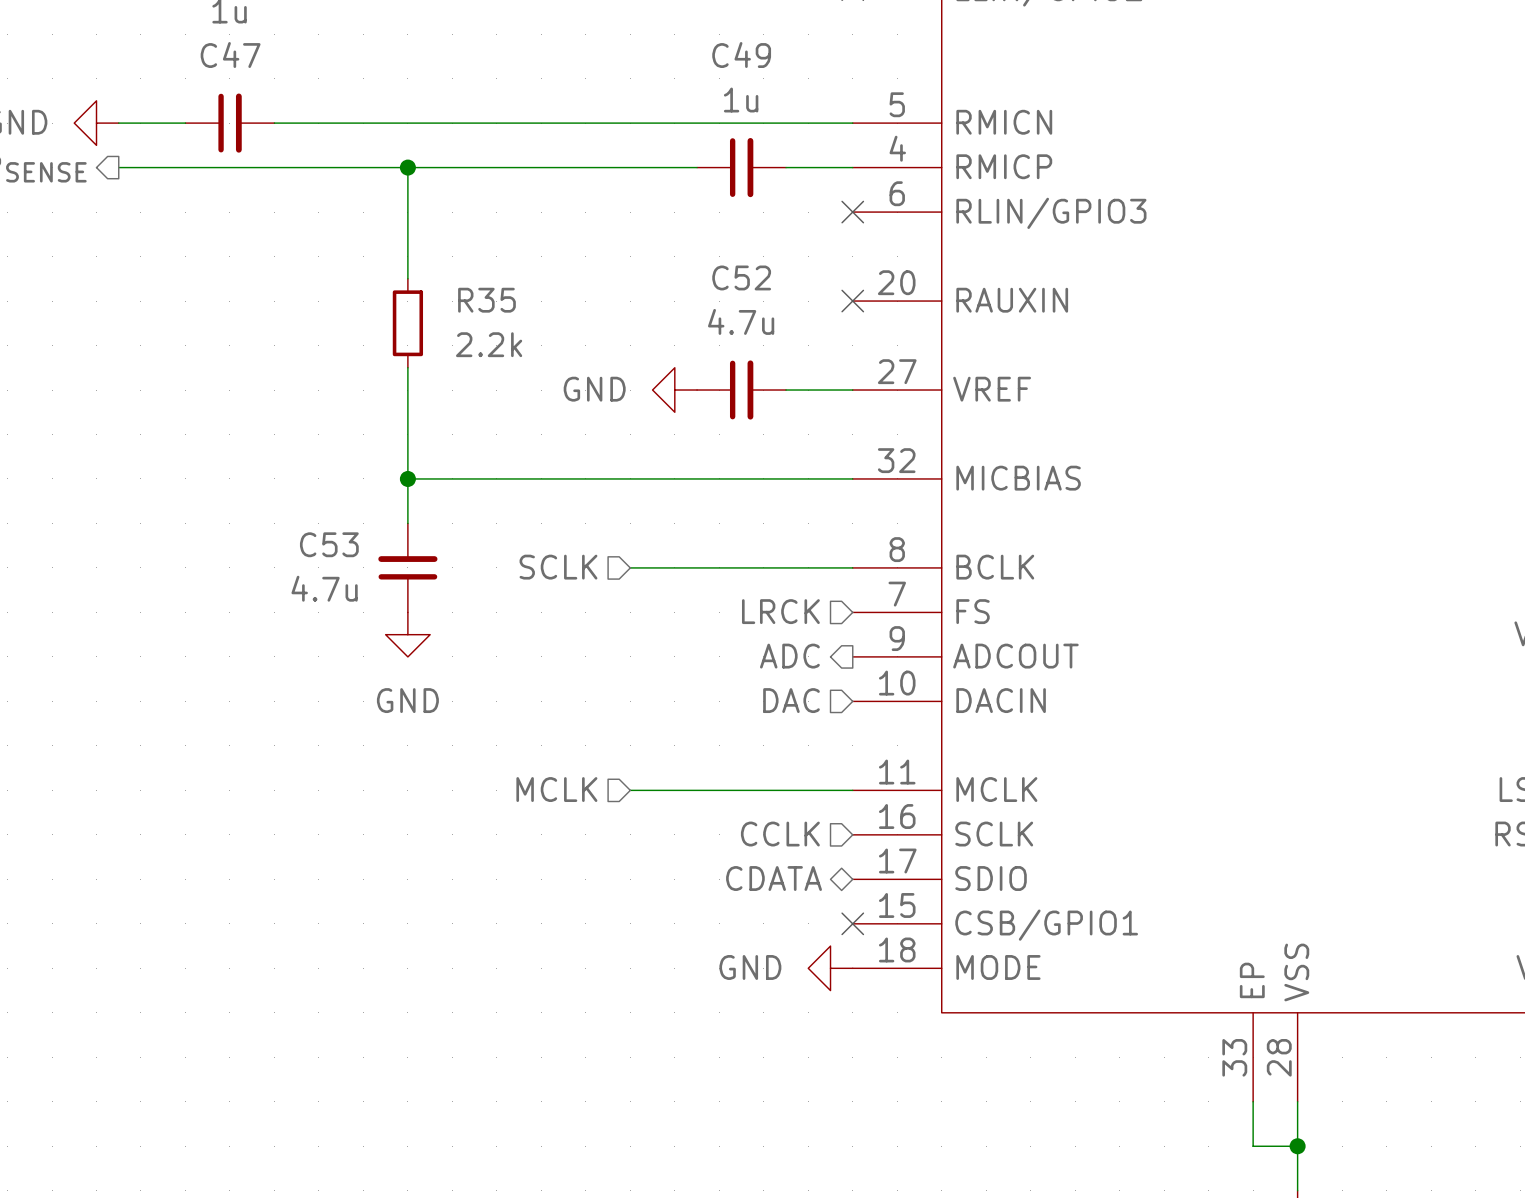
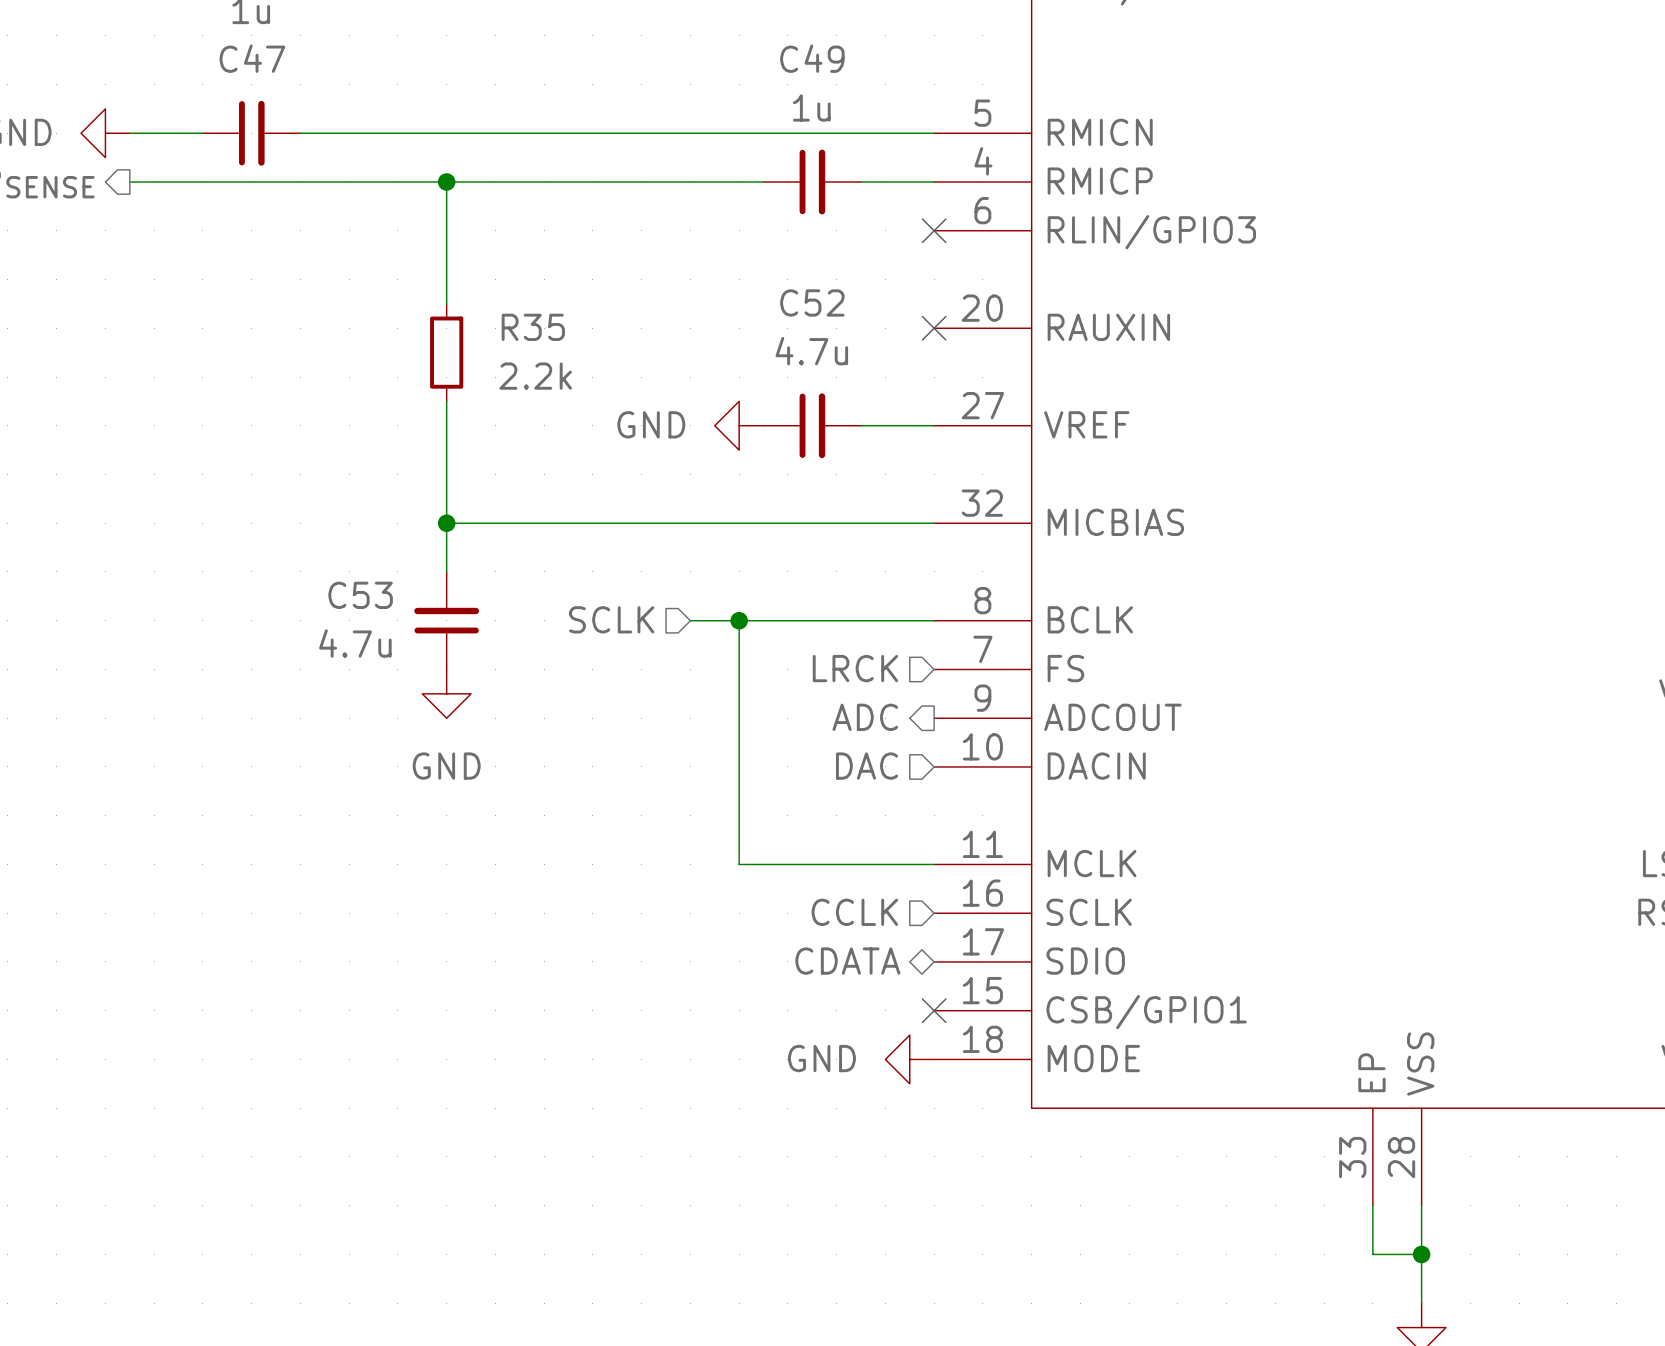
junction: none -> (739, 620)
hierarchical label: MCLK (556, 789) -> none
wire: (630, 790) (674, 790) -> (739, 620) (739, 864)

